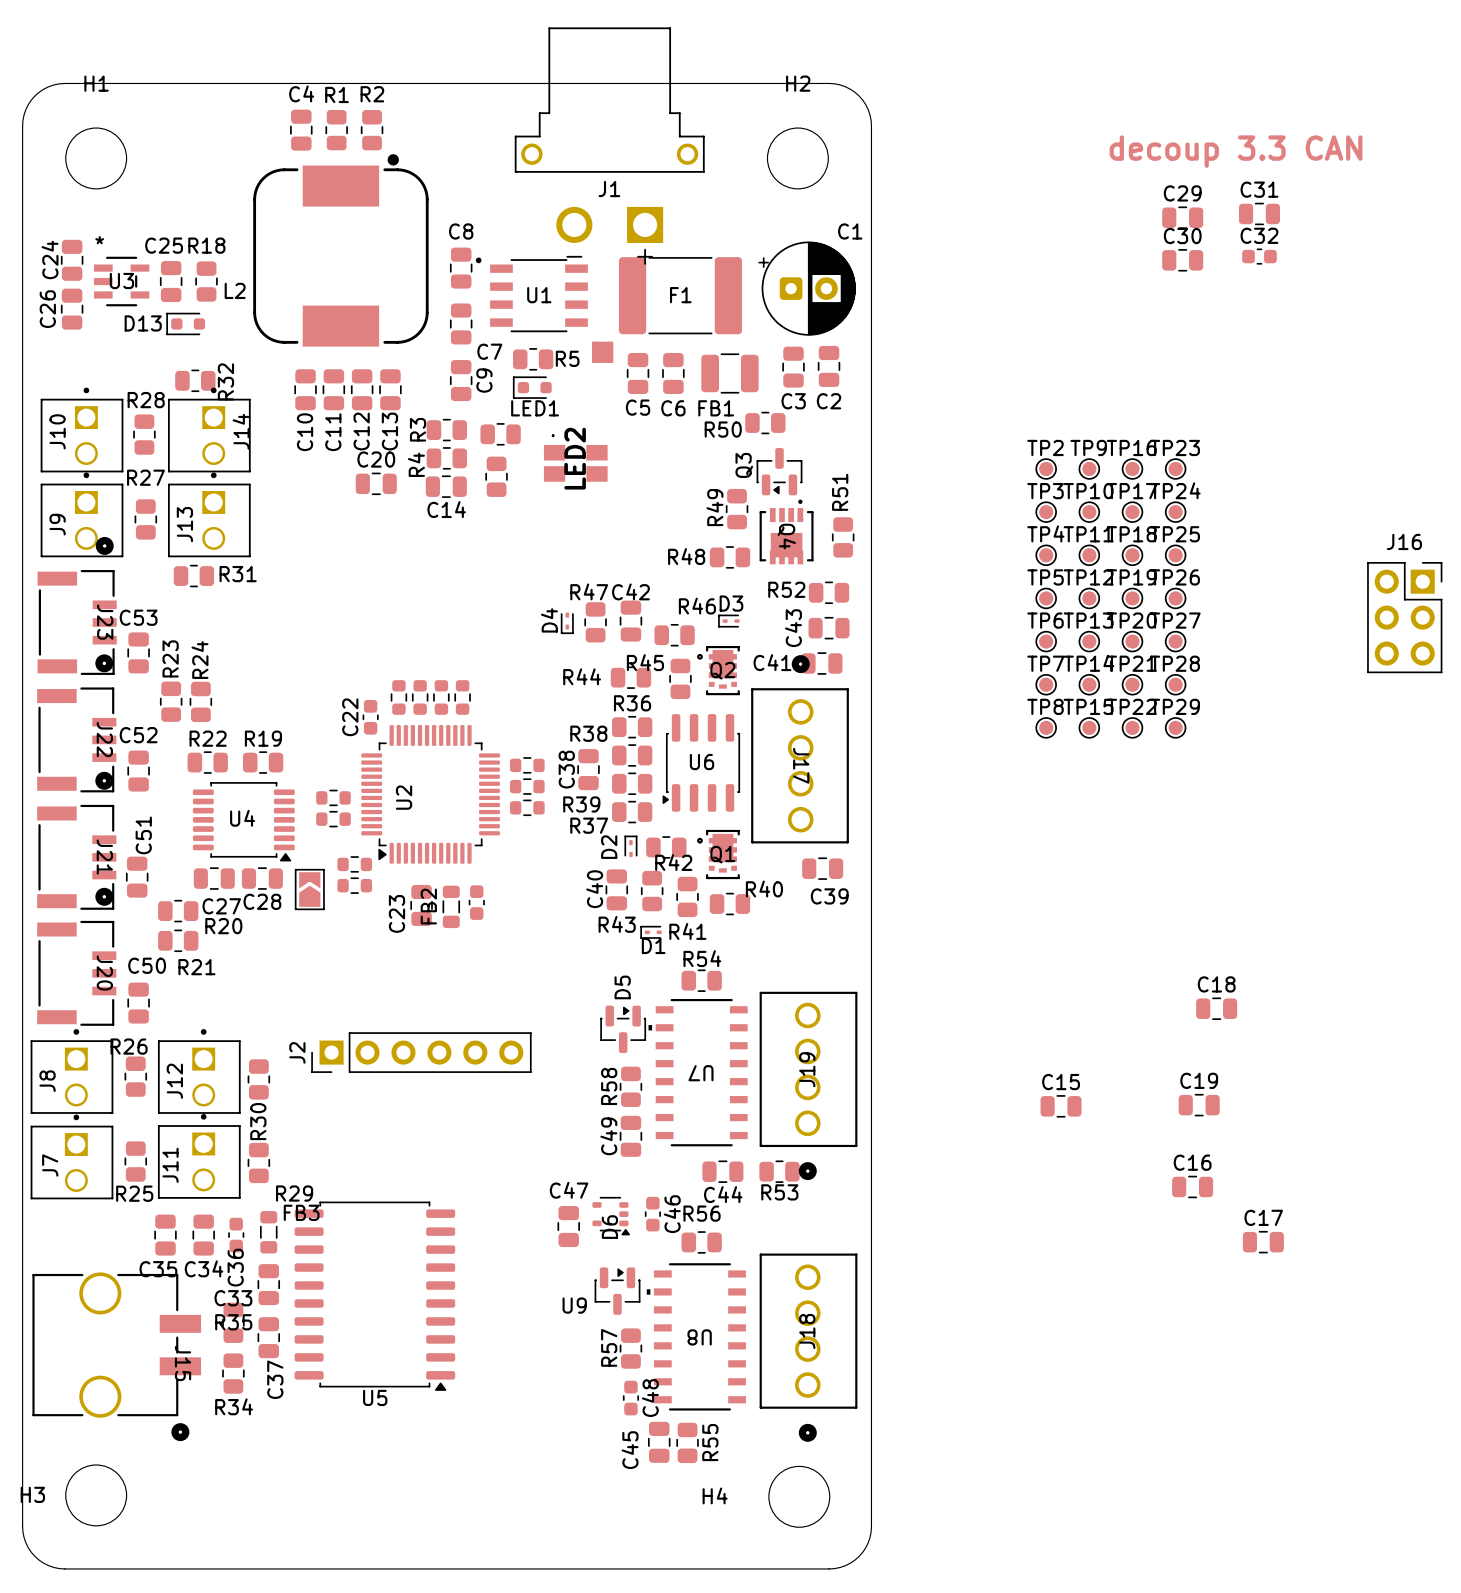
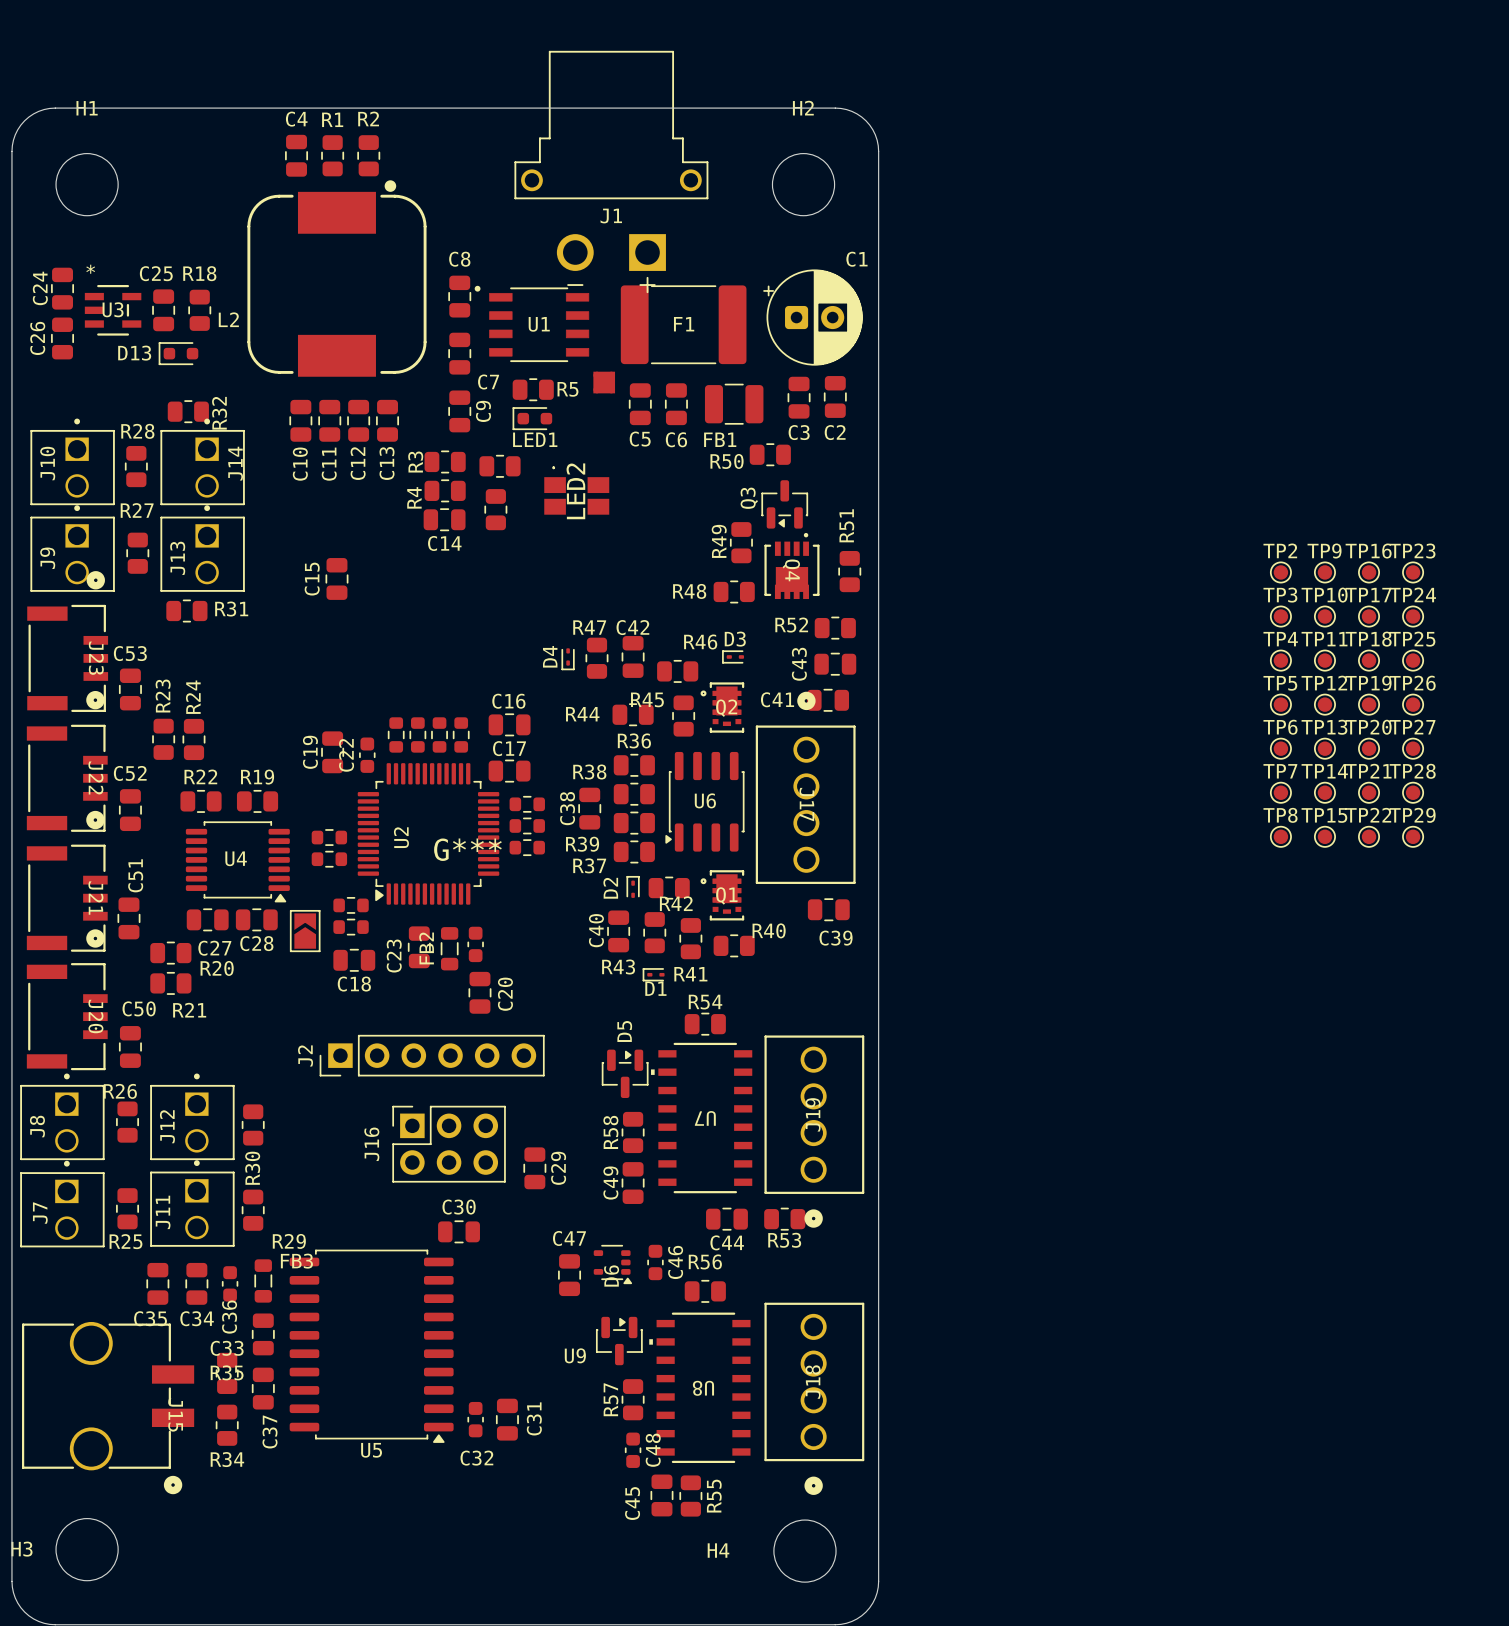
text: decoup 3.3 CAN (1236, 151) -> none
C31 rotation: 0° (1259, 213) -> 90° clockwise (507, 1419)
C31 position: (1259, 213) -> (507, 1419)
C29 rotation: 0° (1182, 217) -> 90° clockwise (534, 1168)
C29 position: (1182, 217) -> (534, 1168)
C32 name position: C32 (1259, 235) -> C32 (476, 1458)
C32 rotation: 0° (1259, 256) -> 90° clockwise (475, 1419)
C32 position: (1259, 256) -> (475, 1419)
C30 position: (1182, 260) -> (459, 1231)
TP2 position: (1046, 468) -> (1280, 572)
TP9 position: (1089, 468) -> (1324, 572)
TP16 position: (1132, 468) -> (1369, 572)
TP23 position: (1175, 468) -> (1413, 572)
C20 rotation: 0° (376, 483) -> 90° clockwise (479, 992)
C20 position: (376, 483) -> (479, 992)
TP3 position: (1046, 512) -> (1280, 616)
TP10 position: (1089, 512) -> (1324, 616)
TP17 position: (1132, 512) -> (1369, 616)
TP24 position: (1175, 512) -> (1413, 616)
TP4 position: (1046, 555) -> (1280, 660)
TP11 position: (1089, 555) -> (1324, 660)
TP18 position: (1132, 555) -> (1369, 660)
TP25 position: (1175, 555) -> (1413, 660)
TP5 position: (1046, 598) -> (1280, 704)
TP12 position: (1089, 598) -> (1324, 704)
TP19 position: (1132, 598) -> (1369, 704)
TP26 position: (1175, 598) -> (1413, 704)
J16 rotation: 0° (1404, 617) -> 90° counterclockwise (449, 1144)
J16 position: (1404, 617) -> (449, 1144)
TP6 position: (1046, 641) -> (1280, 748)
TP13 position: (1089, 641) -> (1324, 748)
TP20 position: (1132, 641) -> (1369, 748)
TP27 position: (1175, 641) -> (1413, 748)
TP7 position: (1046, 684) -> (1280, 792)
TP14 position: (1089, 684) -> (1324, 792)
TP21 position: (1132, 684) -> (1369, 792)
TP28 position: (1175, 684) -> (1413, 792)
TP8 position: (1046, 727) -> (1280, 836)
TP15 position: (1089, 727) -> (1324, 836)
TP22 position: (1132, 727) -> (1369, 836)
TP29 position: (1175, 727) -> (1413, 836)
G***: none -> (467, 849)
C18 name position: C18 (1216, 984) -> C18 (354, 984)
C18 position: (1216, 1008) -> (354, 960)
J2 position: (421, 1052) -> (432, 1055)
C19 name position: C19 (1199, 1080) -> C19 (310, 752)
C15 name position: C15 (1061, 1082) -> C15 (312, 579)
C19 rotation: 0° (1199, 1105) -> 90° clockwise (332, 752)
C19 position: (1199, 1105) -> (332, 752)
C15 rotation: 0° (1061, 1106) -> 90° clockwise (336, 578)
C15 position: (1061, 1106) -> (336, 578)
C16 name position: C16 (1192, 1162) -> C16 (508, 701)
C16 position: (1192, 1186) -> (509, 771)
C17 name position: C17 (1263, 1217) -> C17 (509, 748)
C17 position: (1263, 1242) -> (509, 724)

